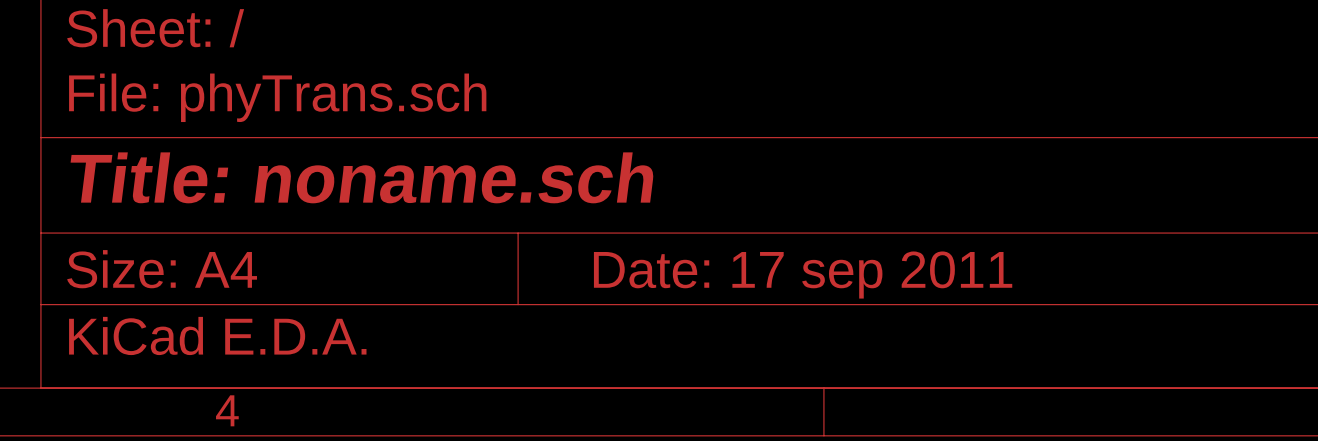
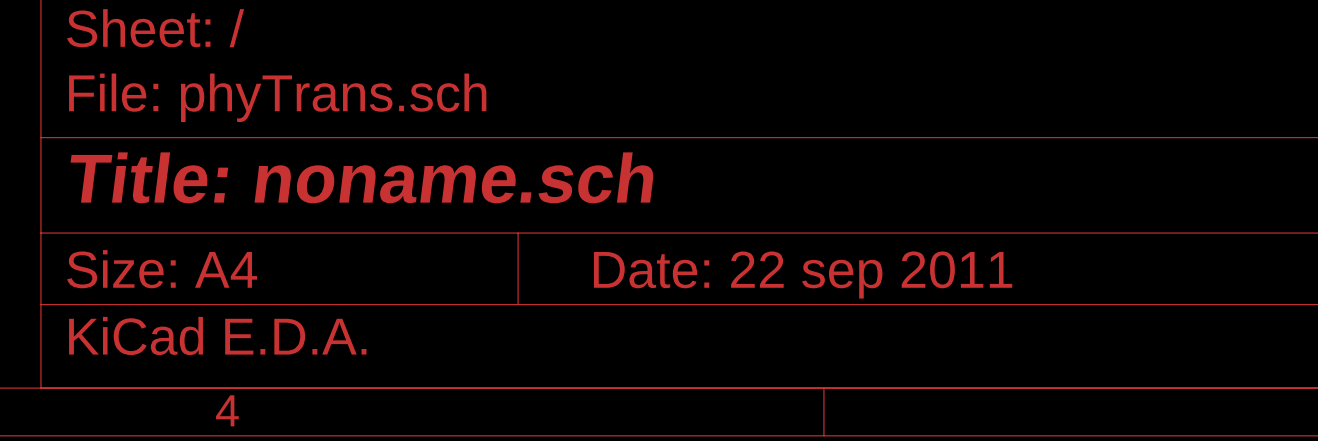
title block: Date: 17 sep 2011 (803, 275) -> Date: 22 sep 2011 (803, 275)

